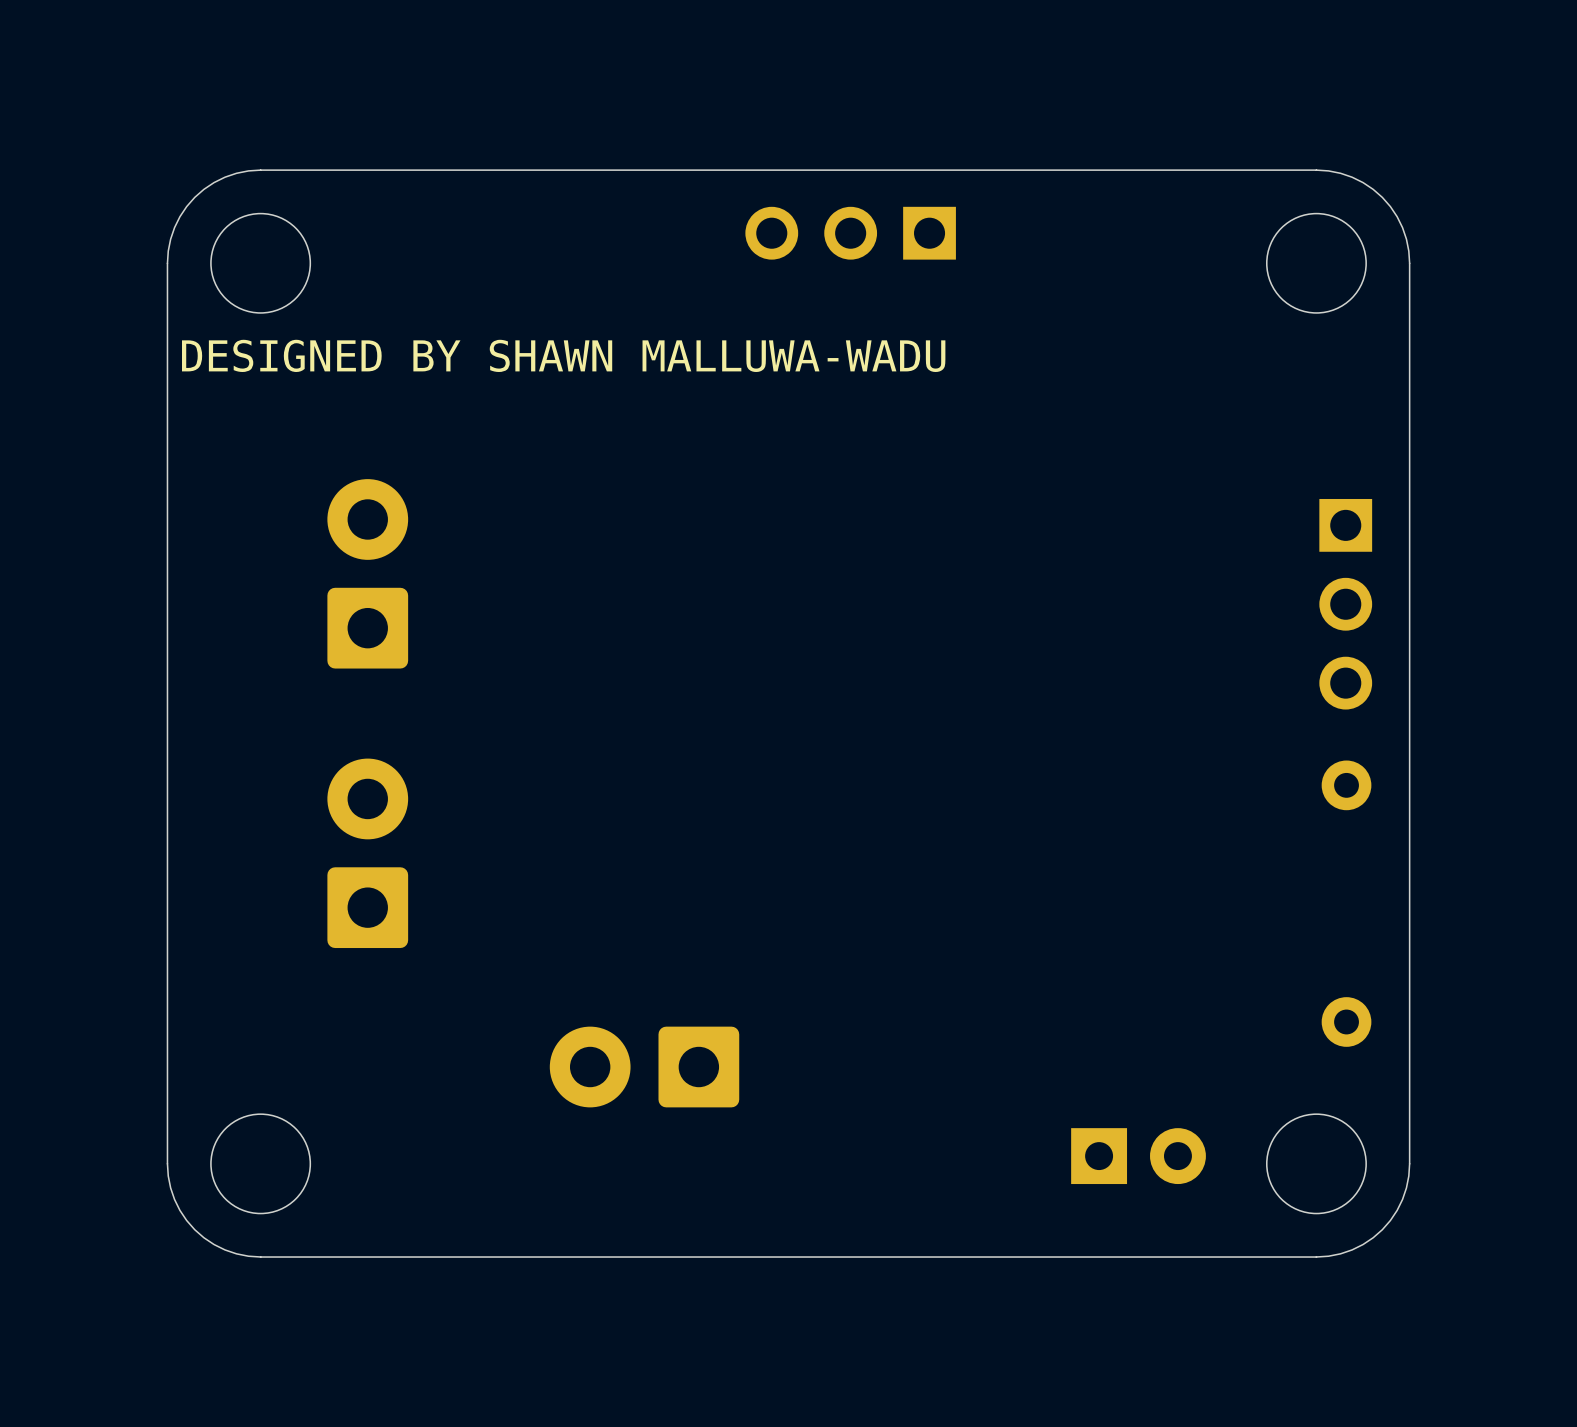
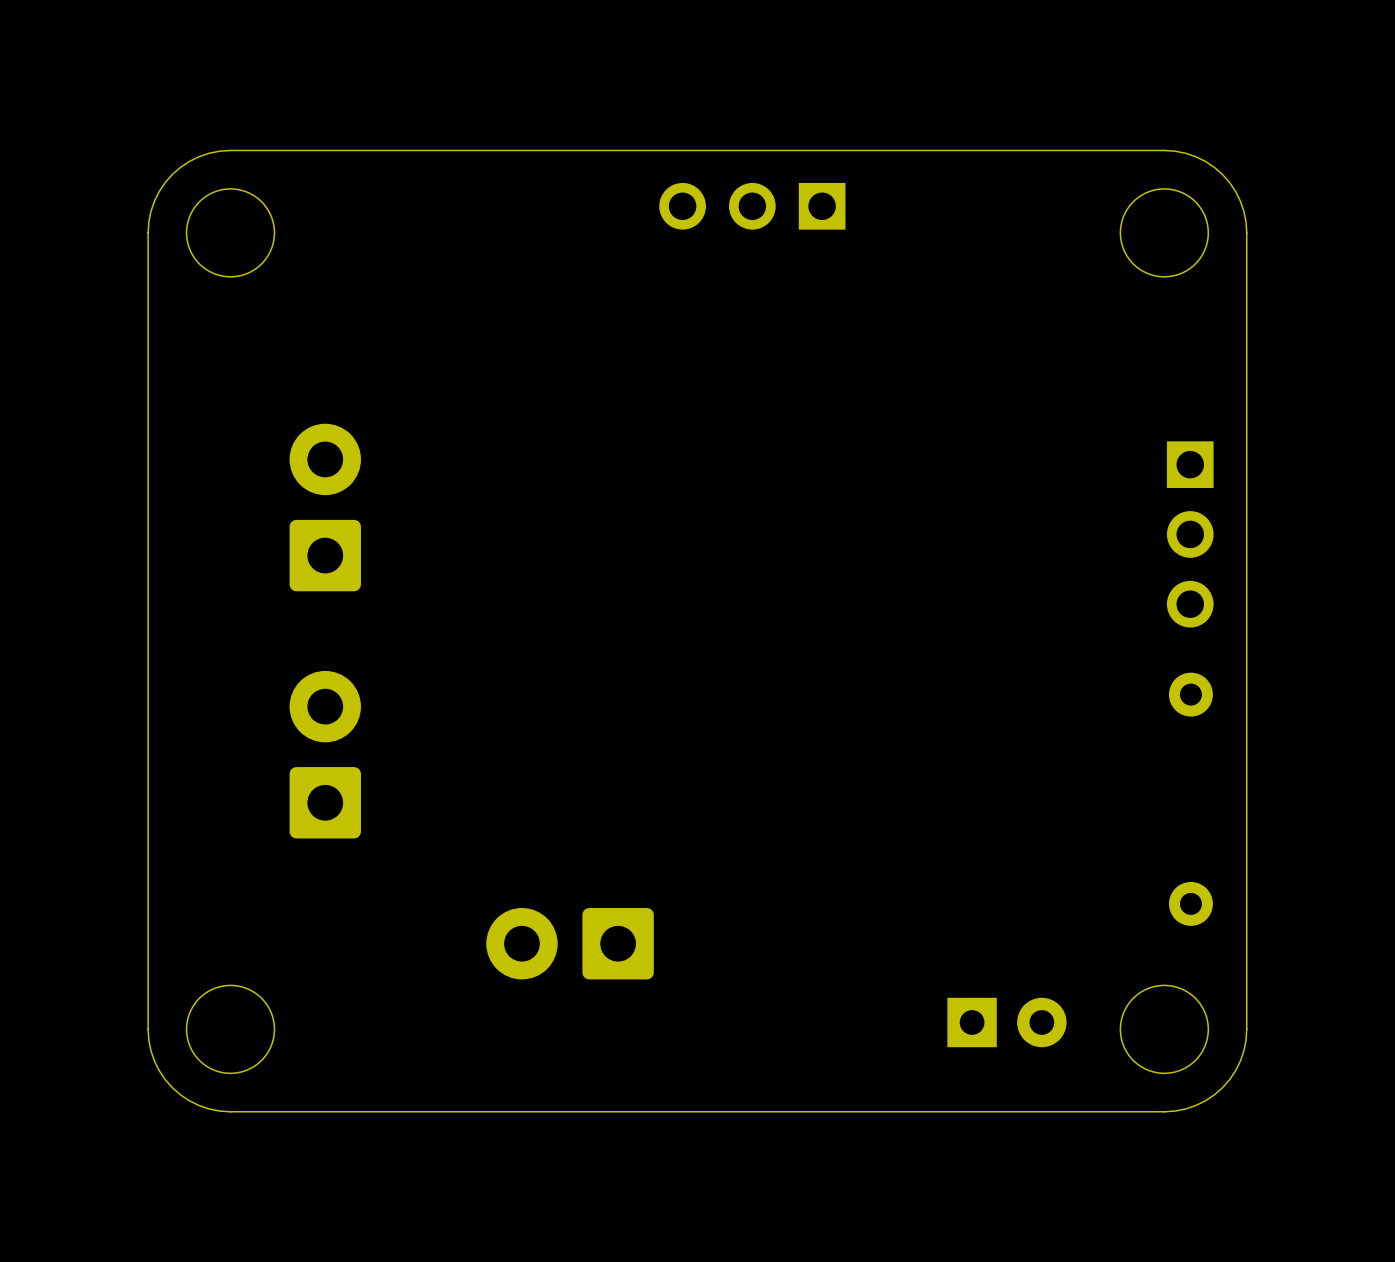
text: DESIGNED BY SHAWN MALLUWA-WADU (563, 355) -> none

